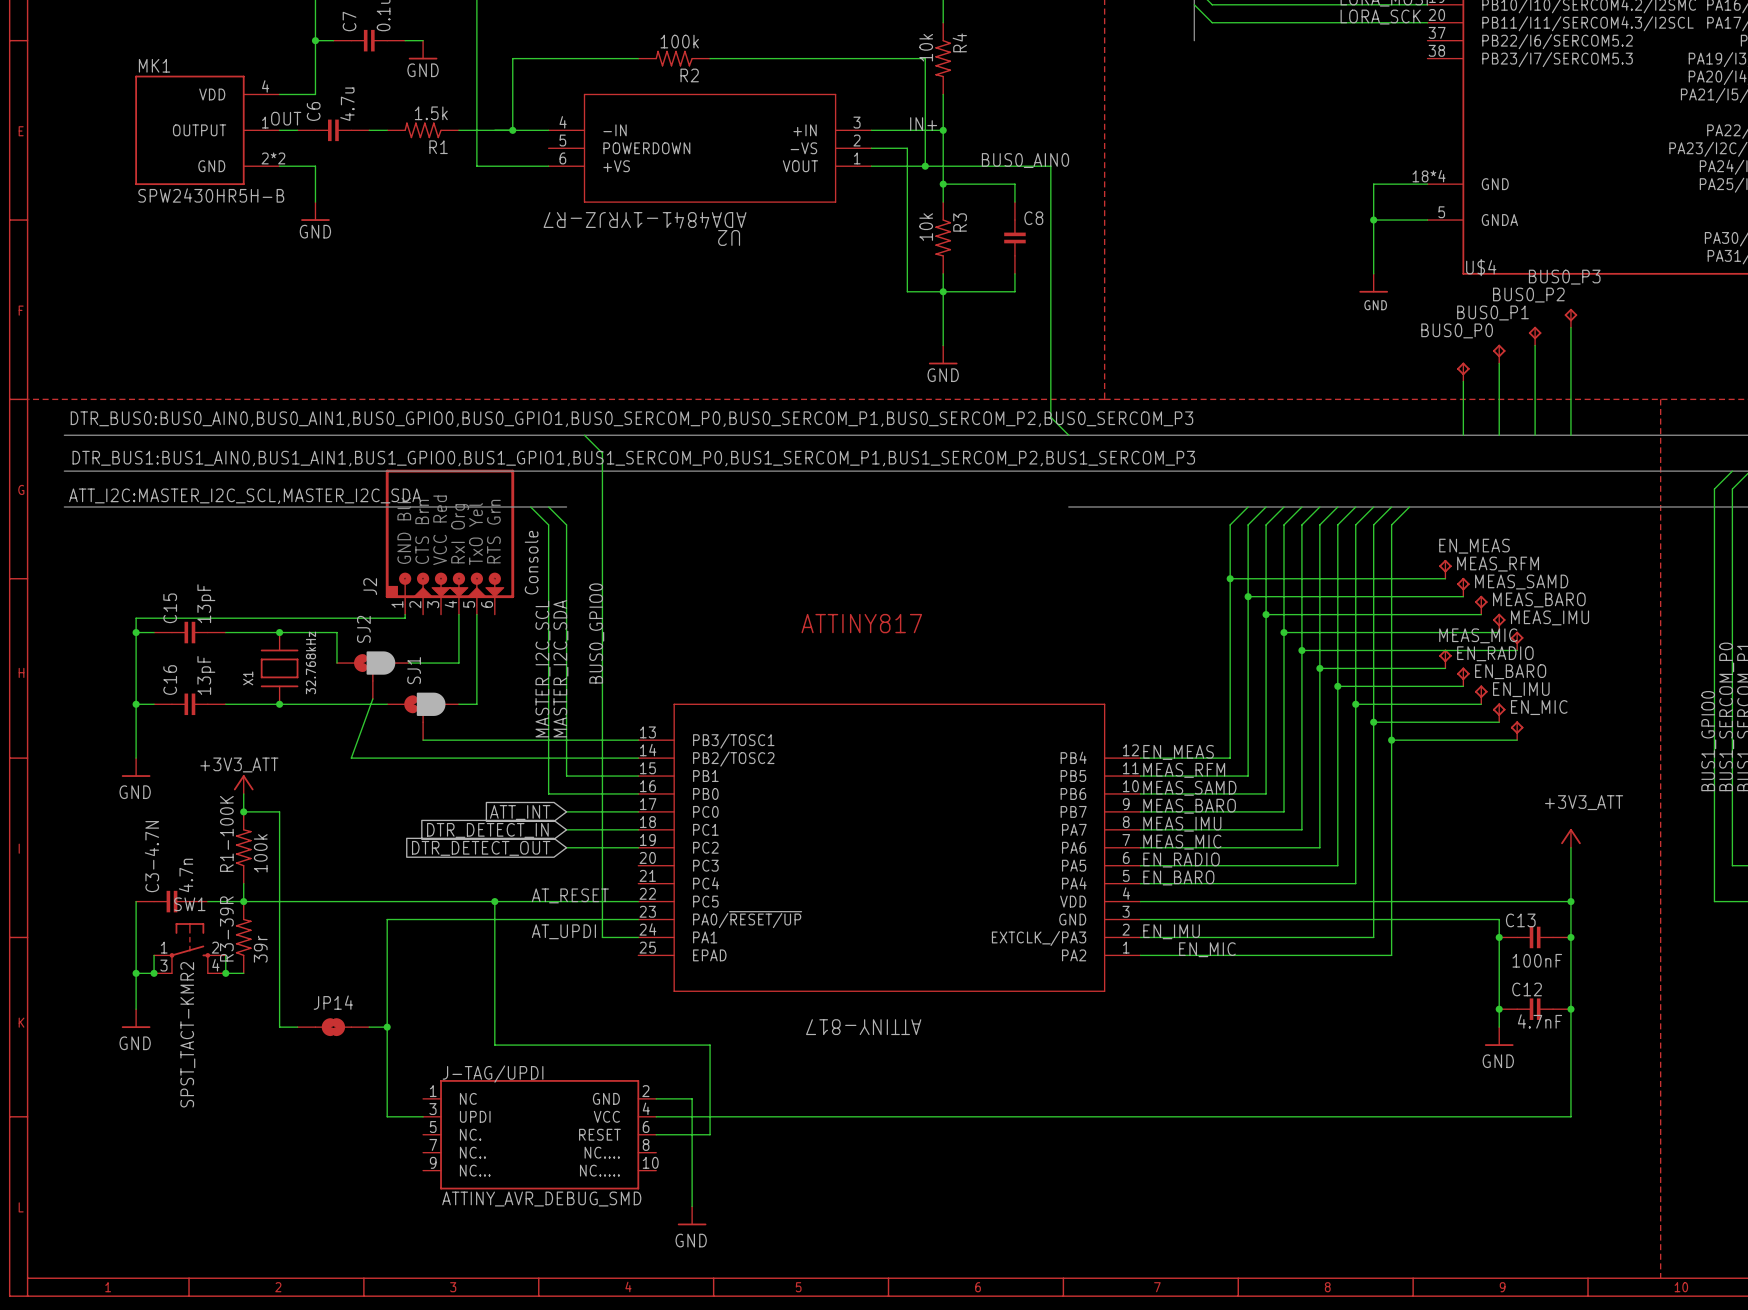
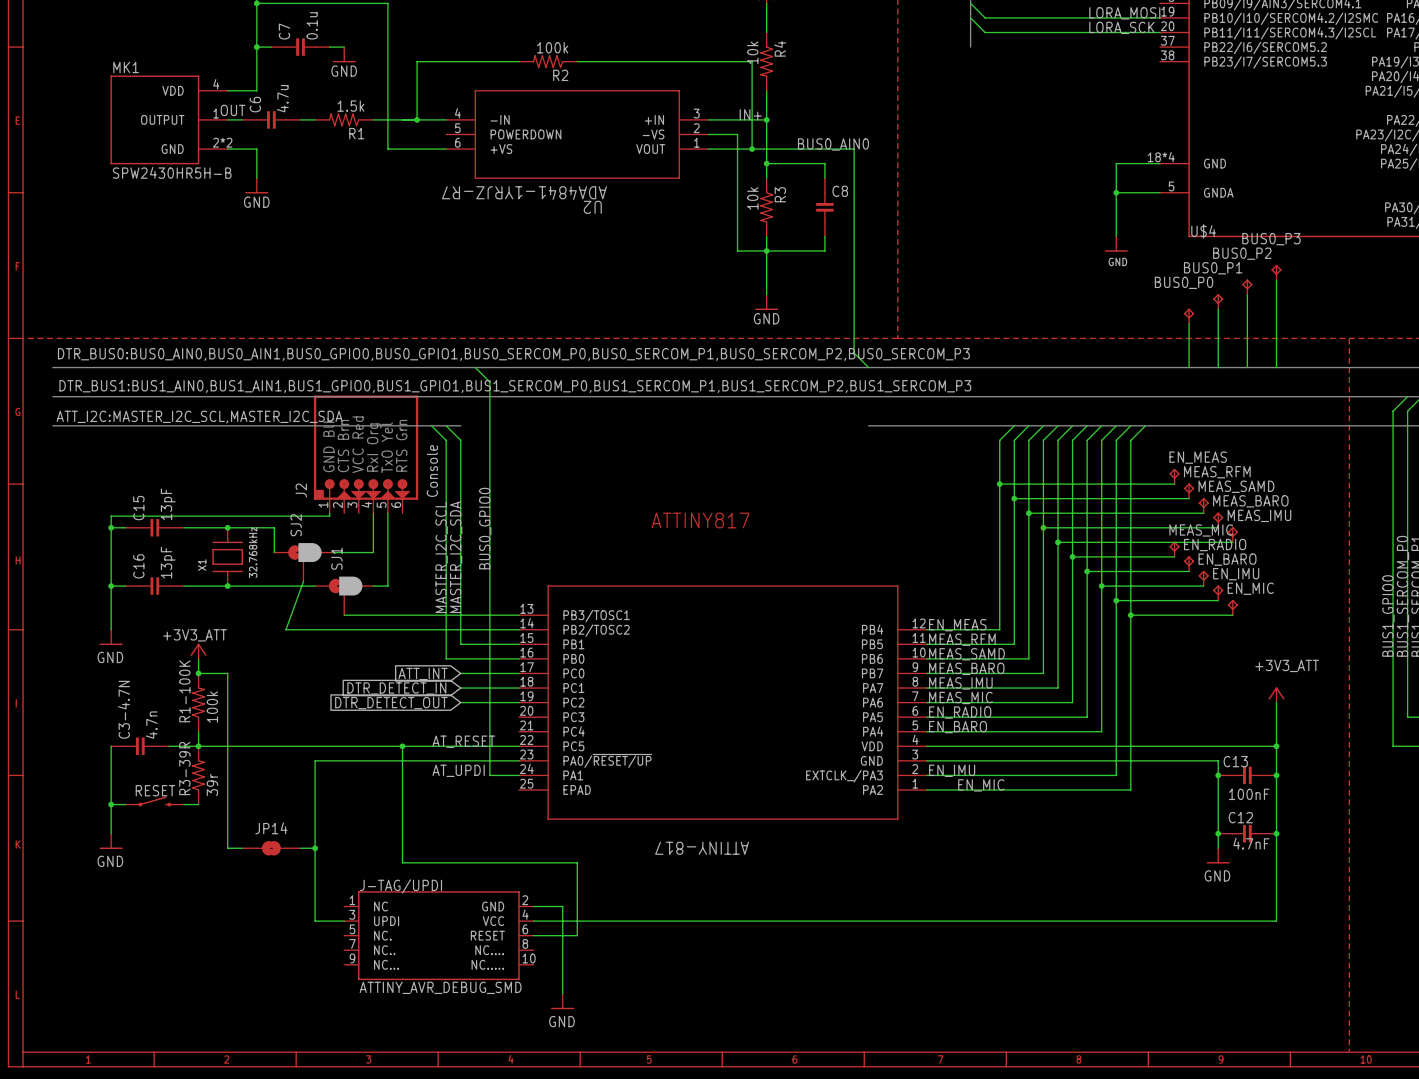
SW1: SPST_TACT-KMR2 (189, 948) -> none
wire: (154, 955) (154, 973) -> none
wire: (225, 955) (225, 973) -> none
RESET: none -> (154, 801)
junction: (154, 973) -> none
junction: (225, 973) -> none

